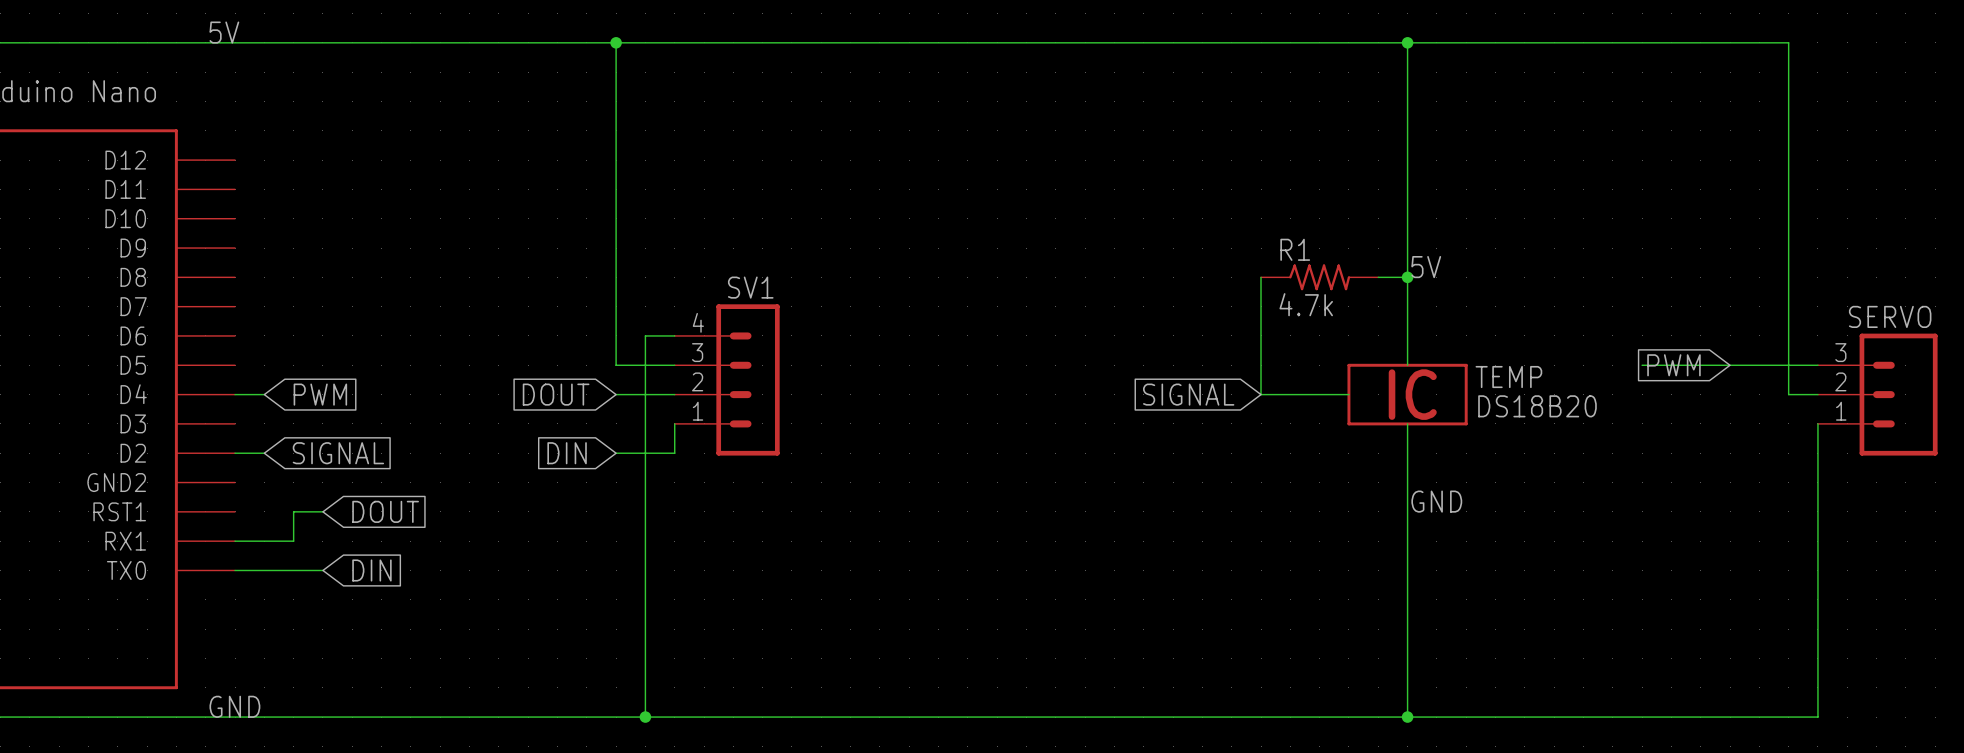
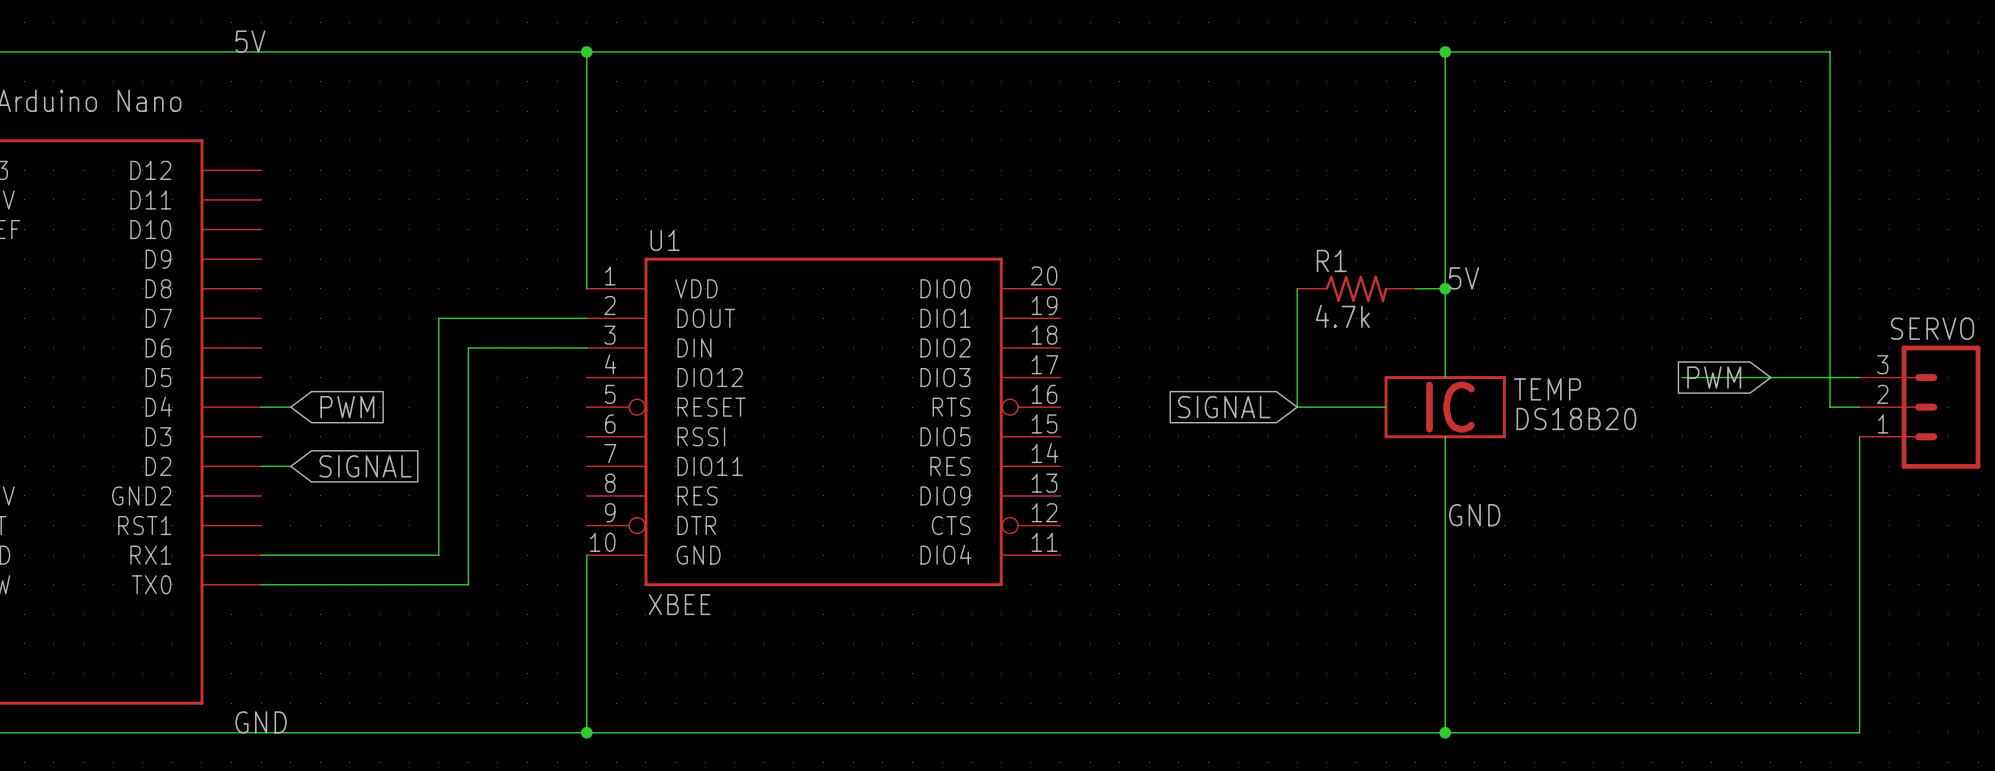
wire: none -> (586, 51) (586, 288)
wire: (616, 42) (616, 365) (674, 365) -> none
junction position: (616, 42) -> (586, 51)
wire: none -> (586, 347) (468, 347) (468, 584) (349, 584)
wire: (674, 335) (645, 335) (645, 717) -> none
SV1: (727, 379) -> none
global label: DOUT (556, 394) -> none
wire: (616, 394) (674, 394) -> none
U1: none -> XBEE (823, 421)
wire: (674, 423) (674, 453) (616, 453) -> none
global label: DIN (567, 453) -> none
wire: (322, 511) (293, 511) (293, 541) -> (586, 318) (438, 318) (438, 555) (320, 555)
global label: DOUT (385, 511) -> none
wire: none -> (586, 555) (586, 732)
global label: DIN (371, 570) -> none
junction: none -> (586, 732)
junction: (645, 717) -> none

